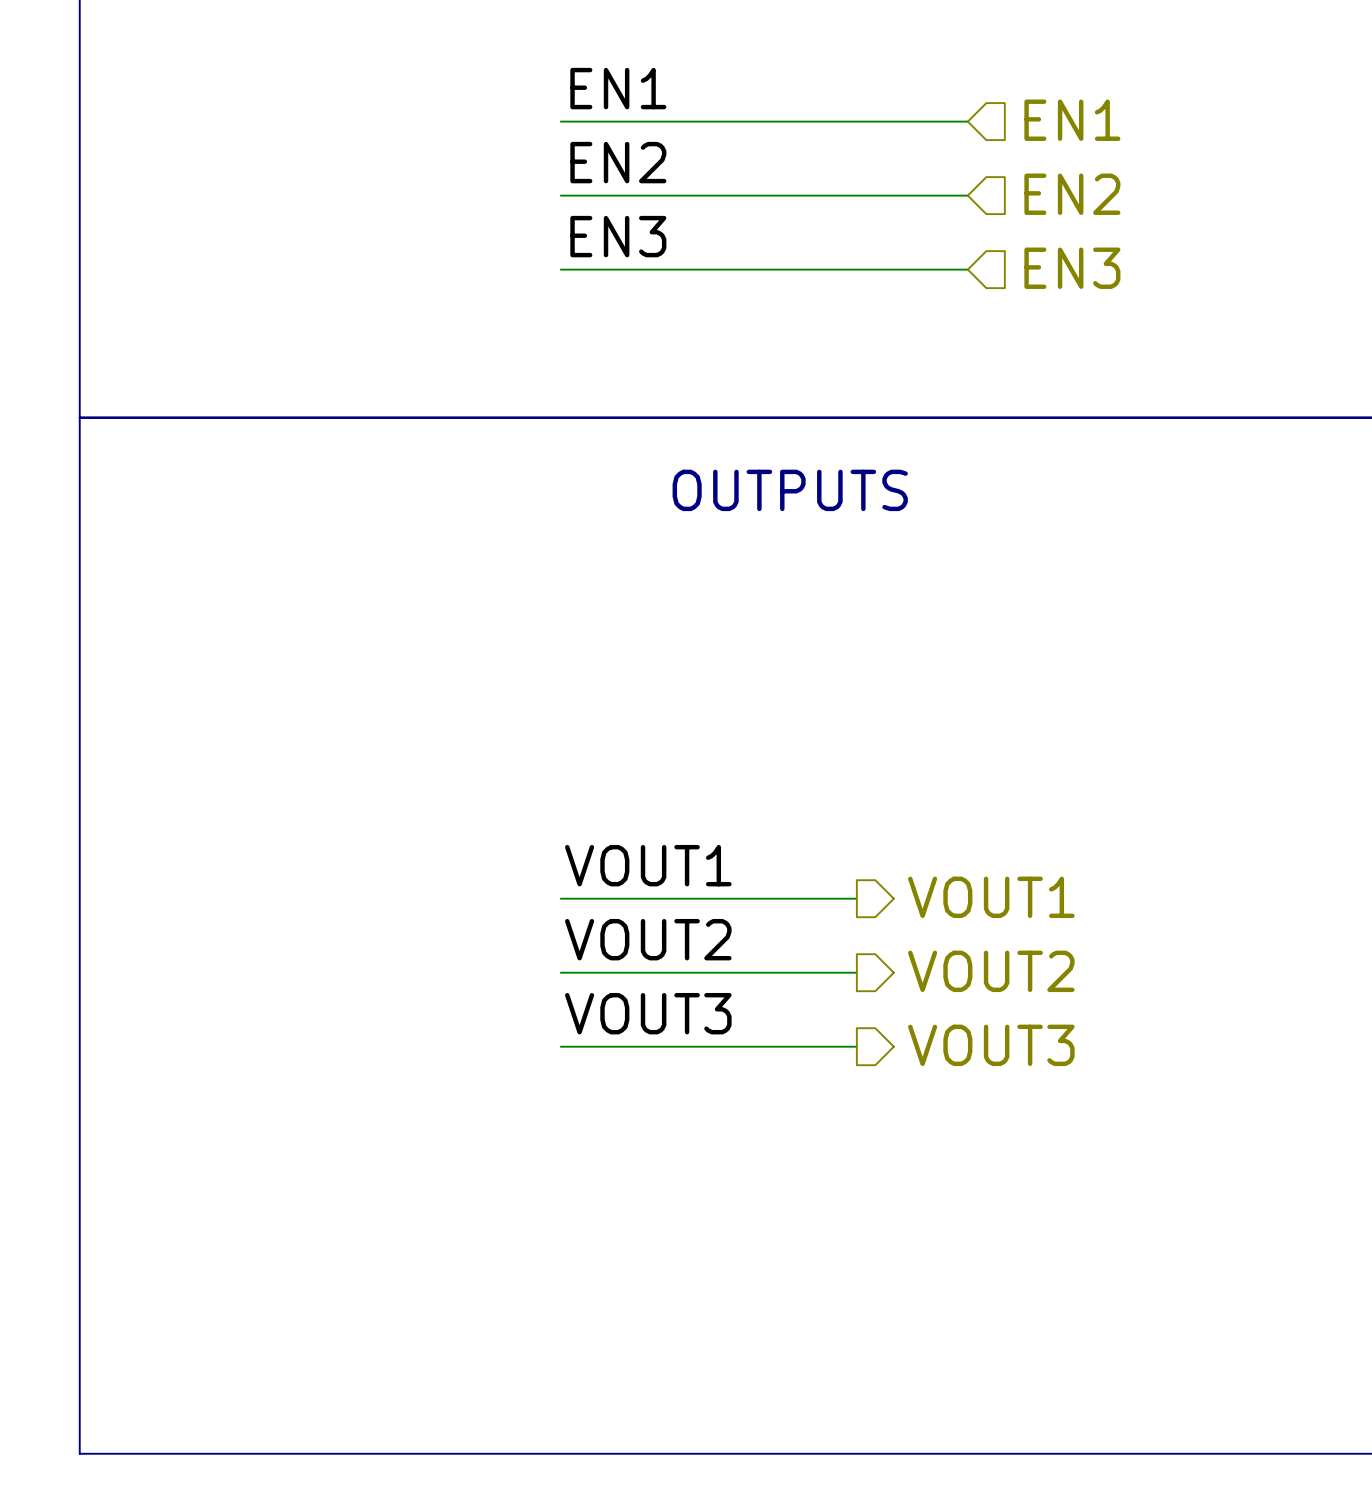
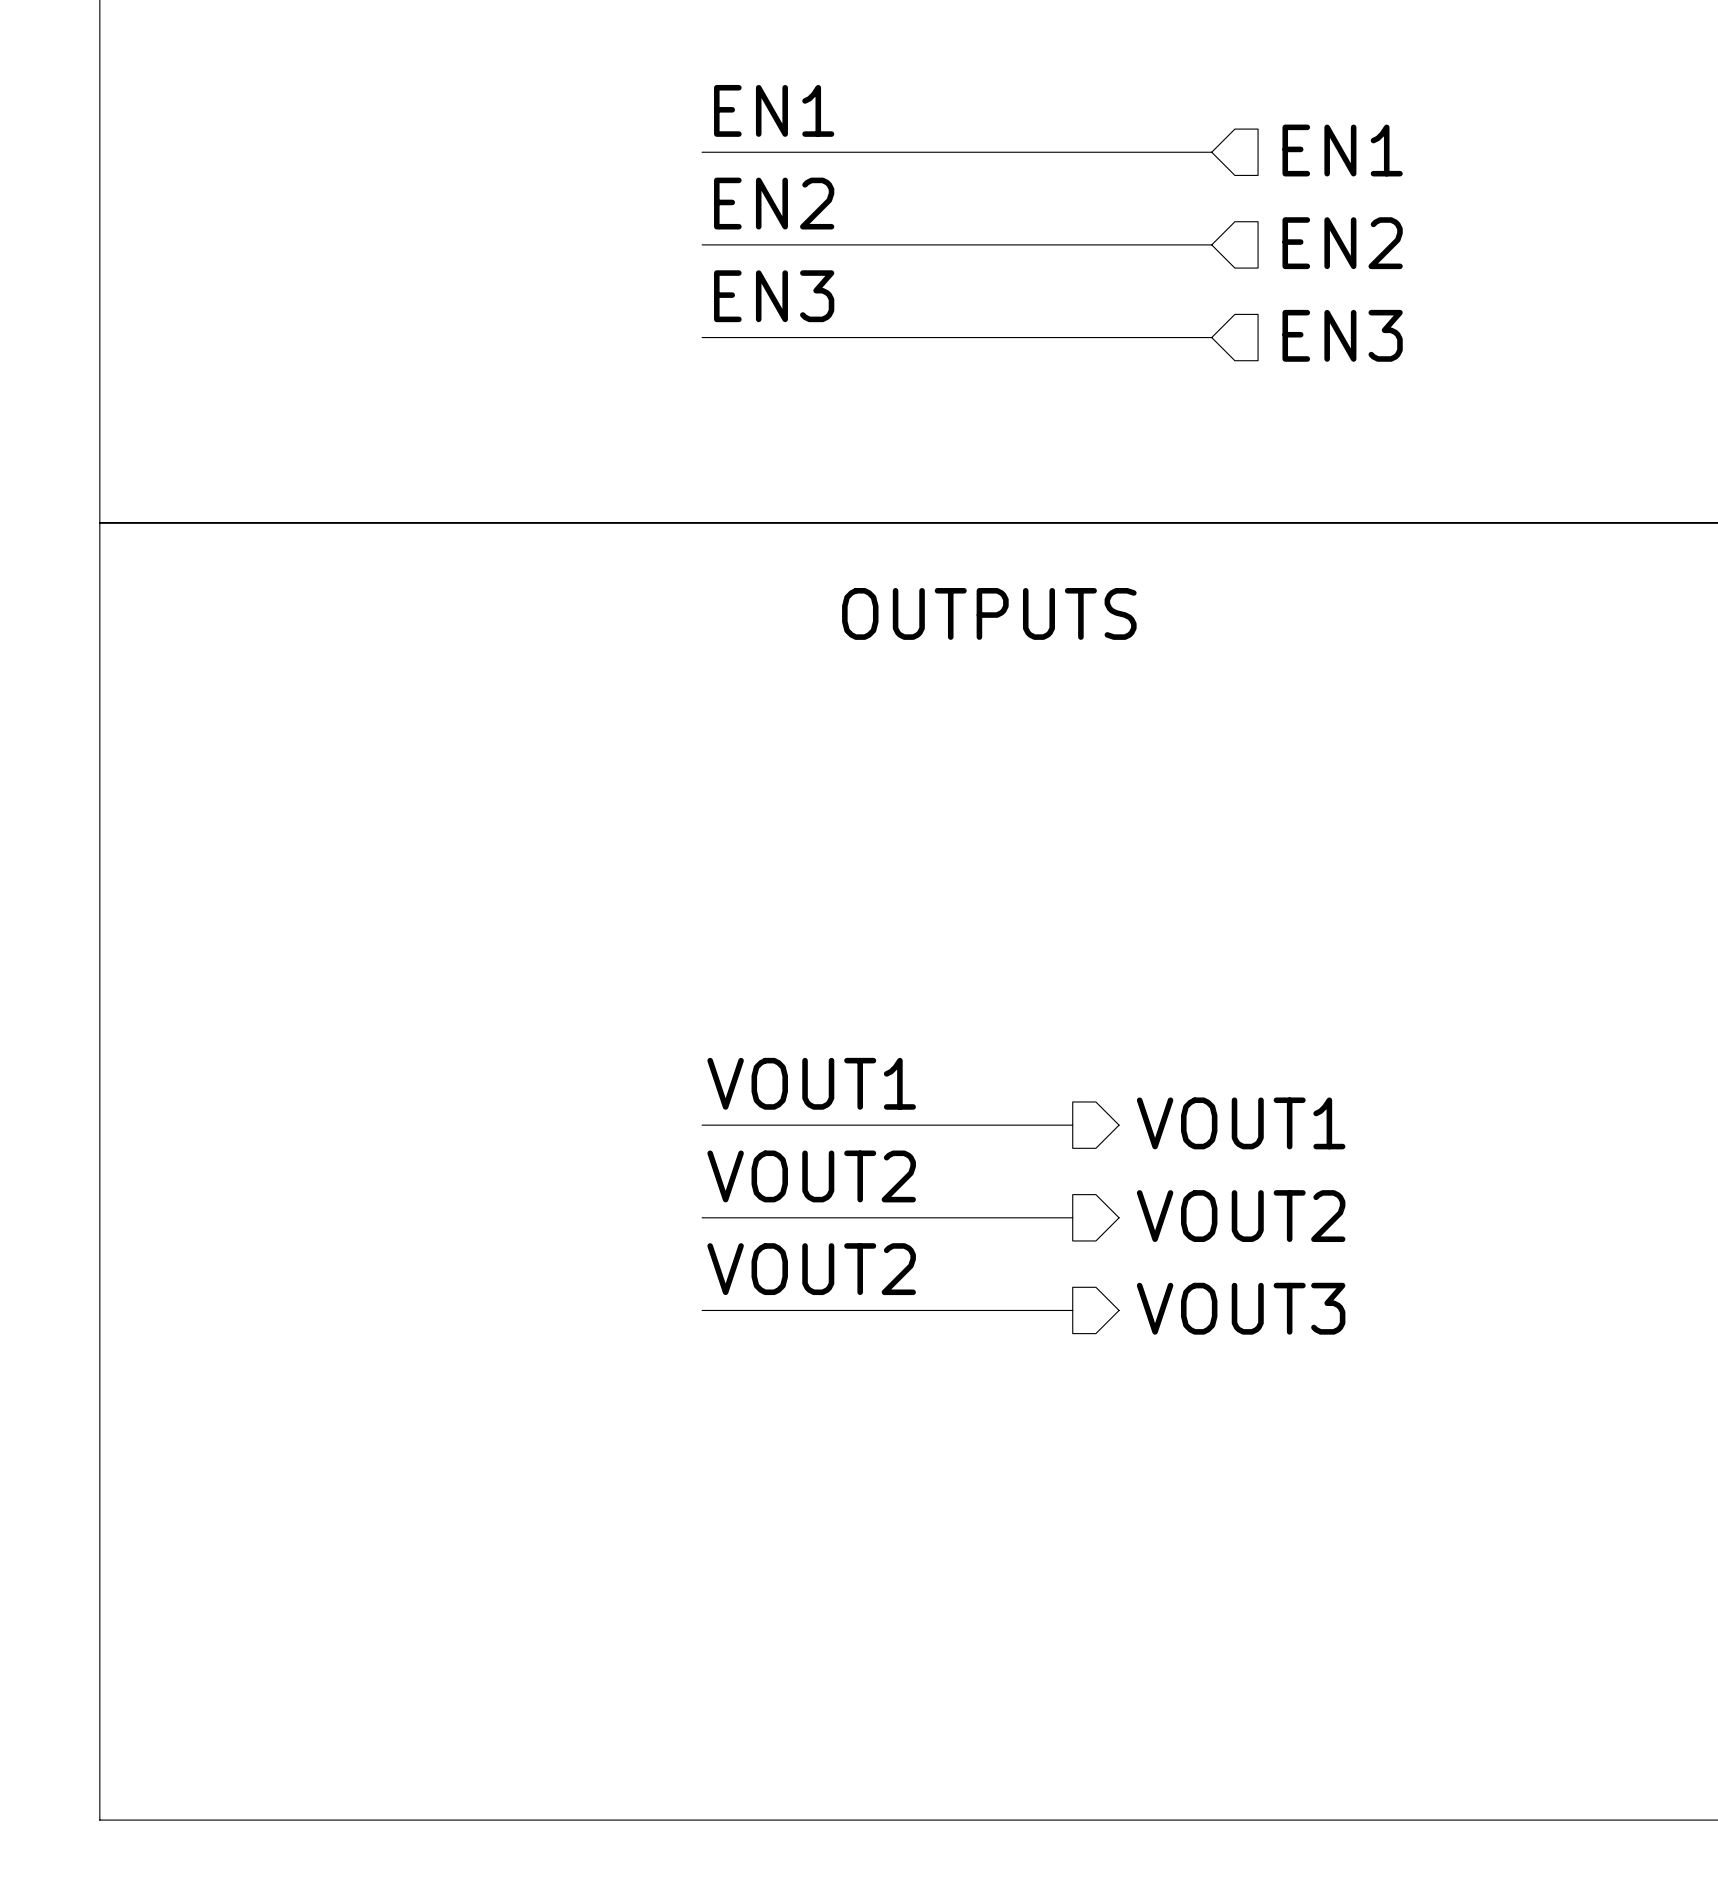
label: VOUT3 (648, 1013) -> VOUT2 (811, 1269)

